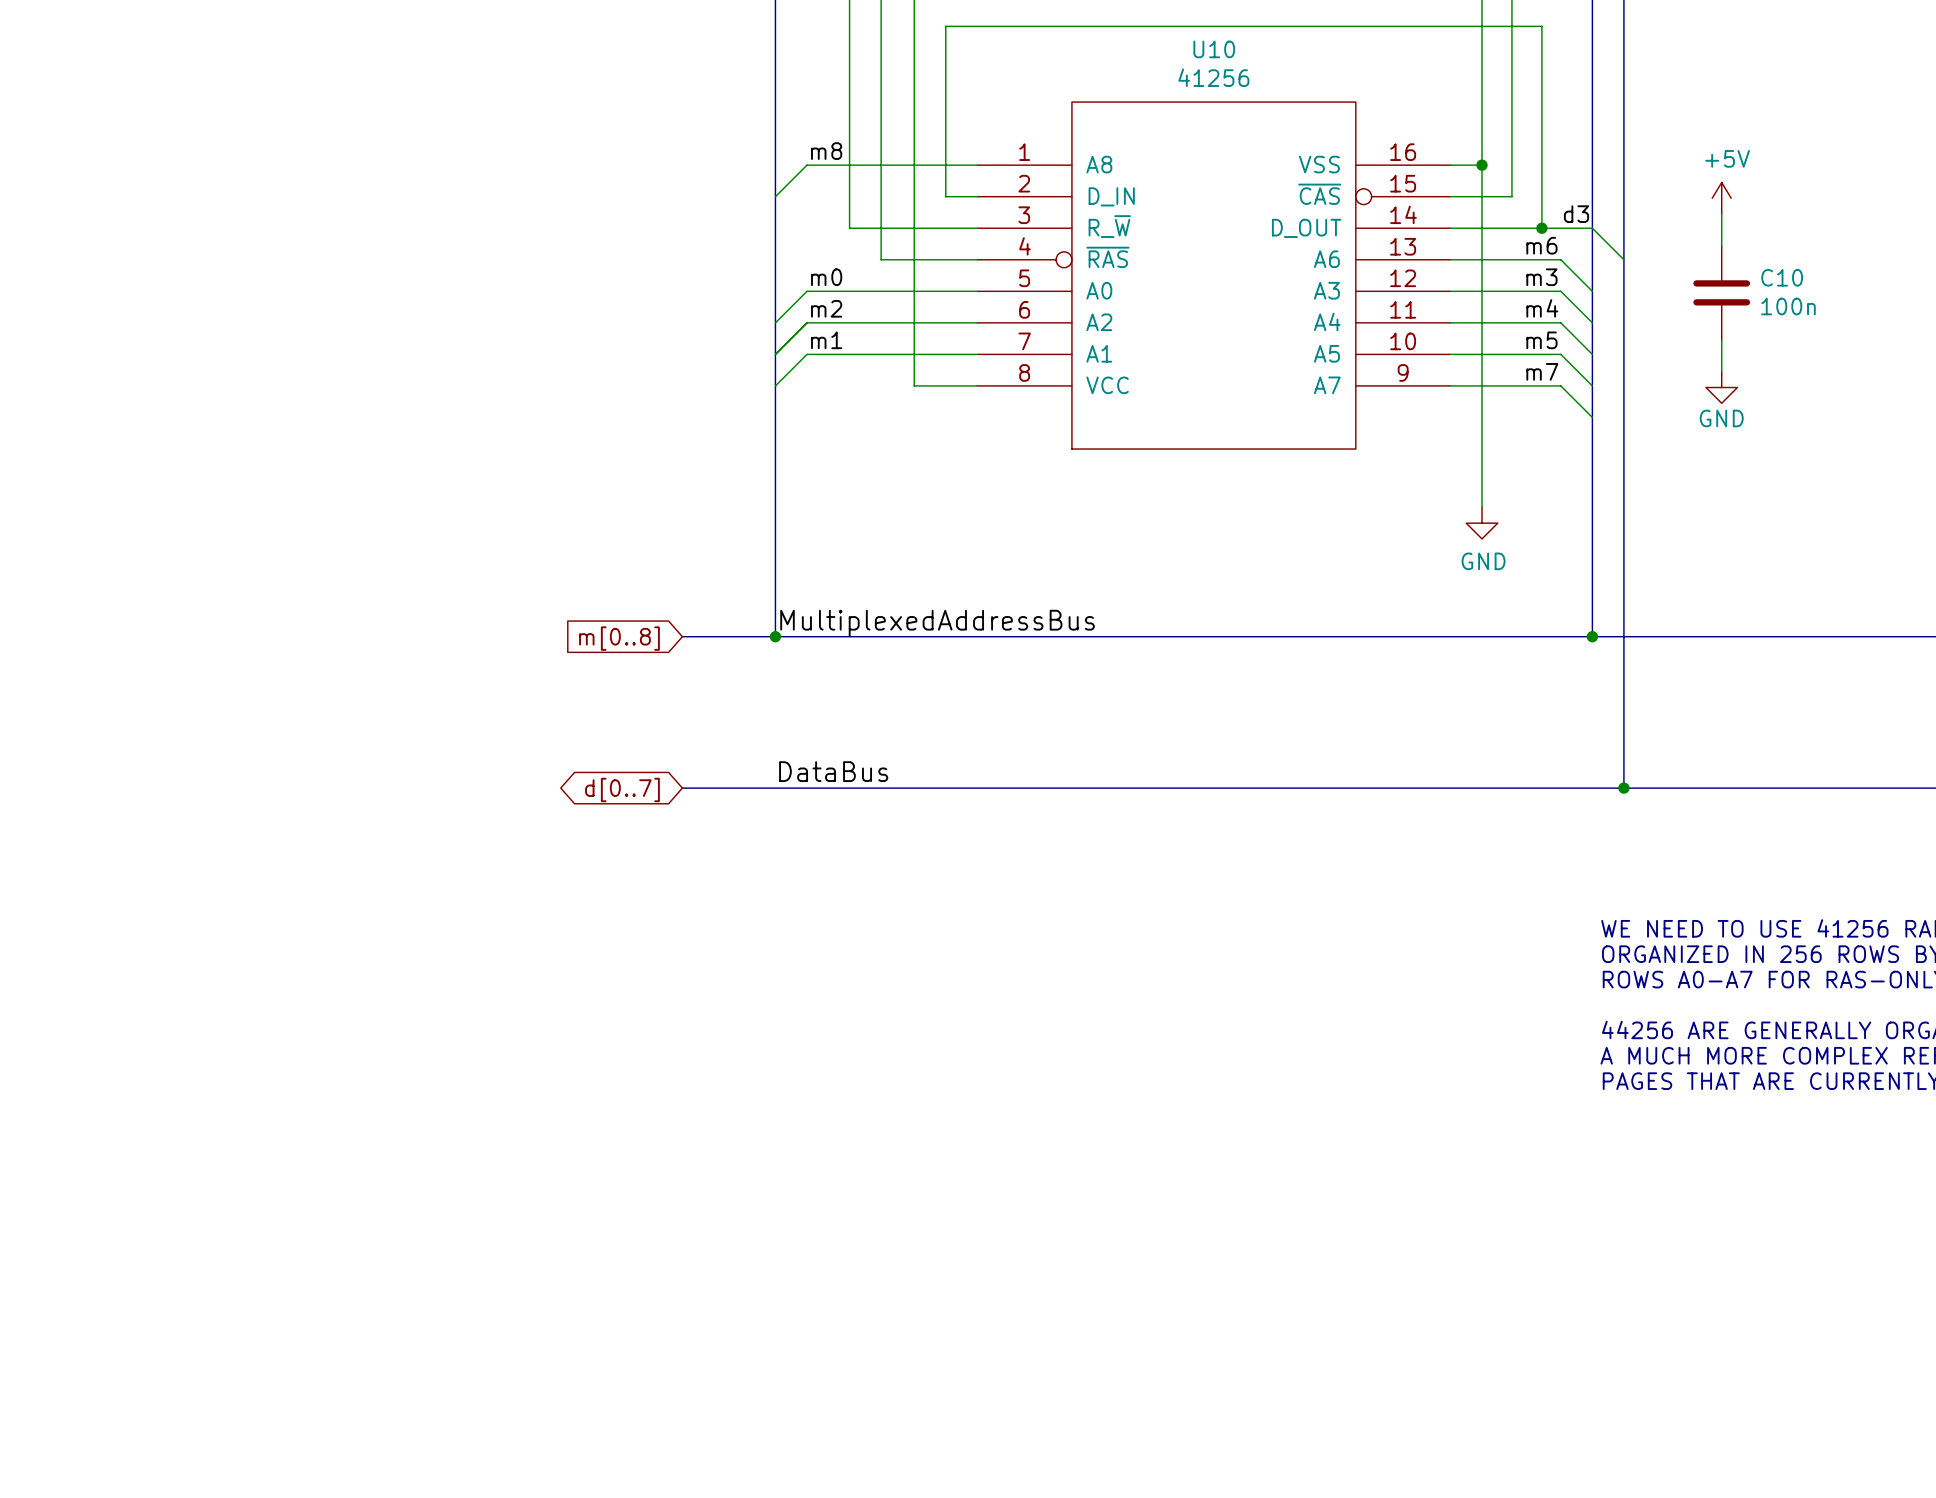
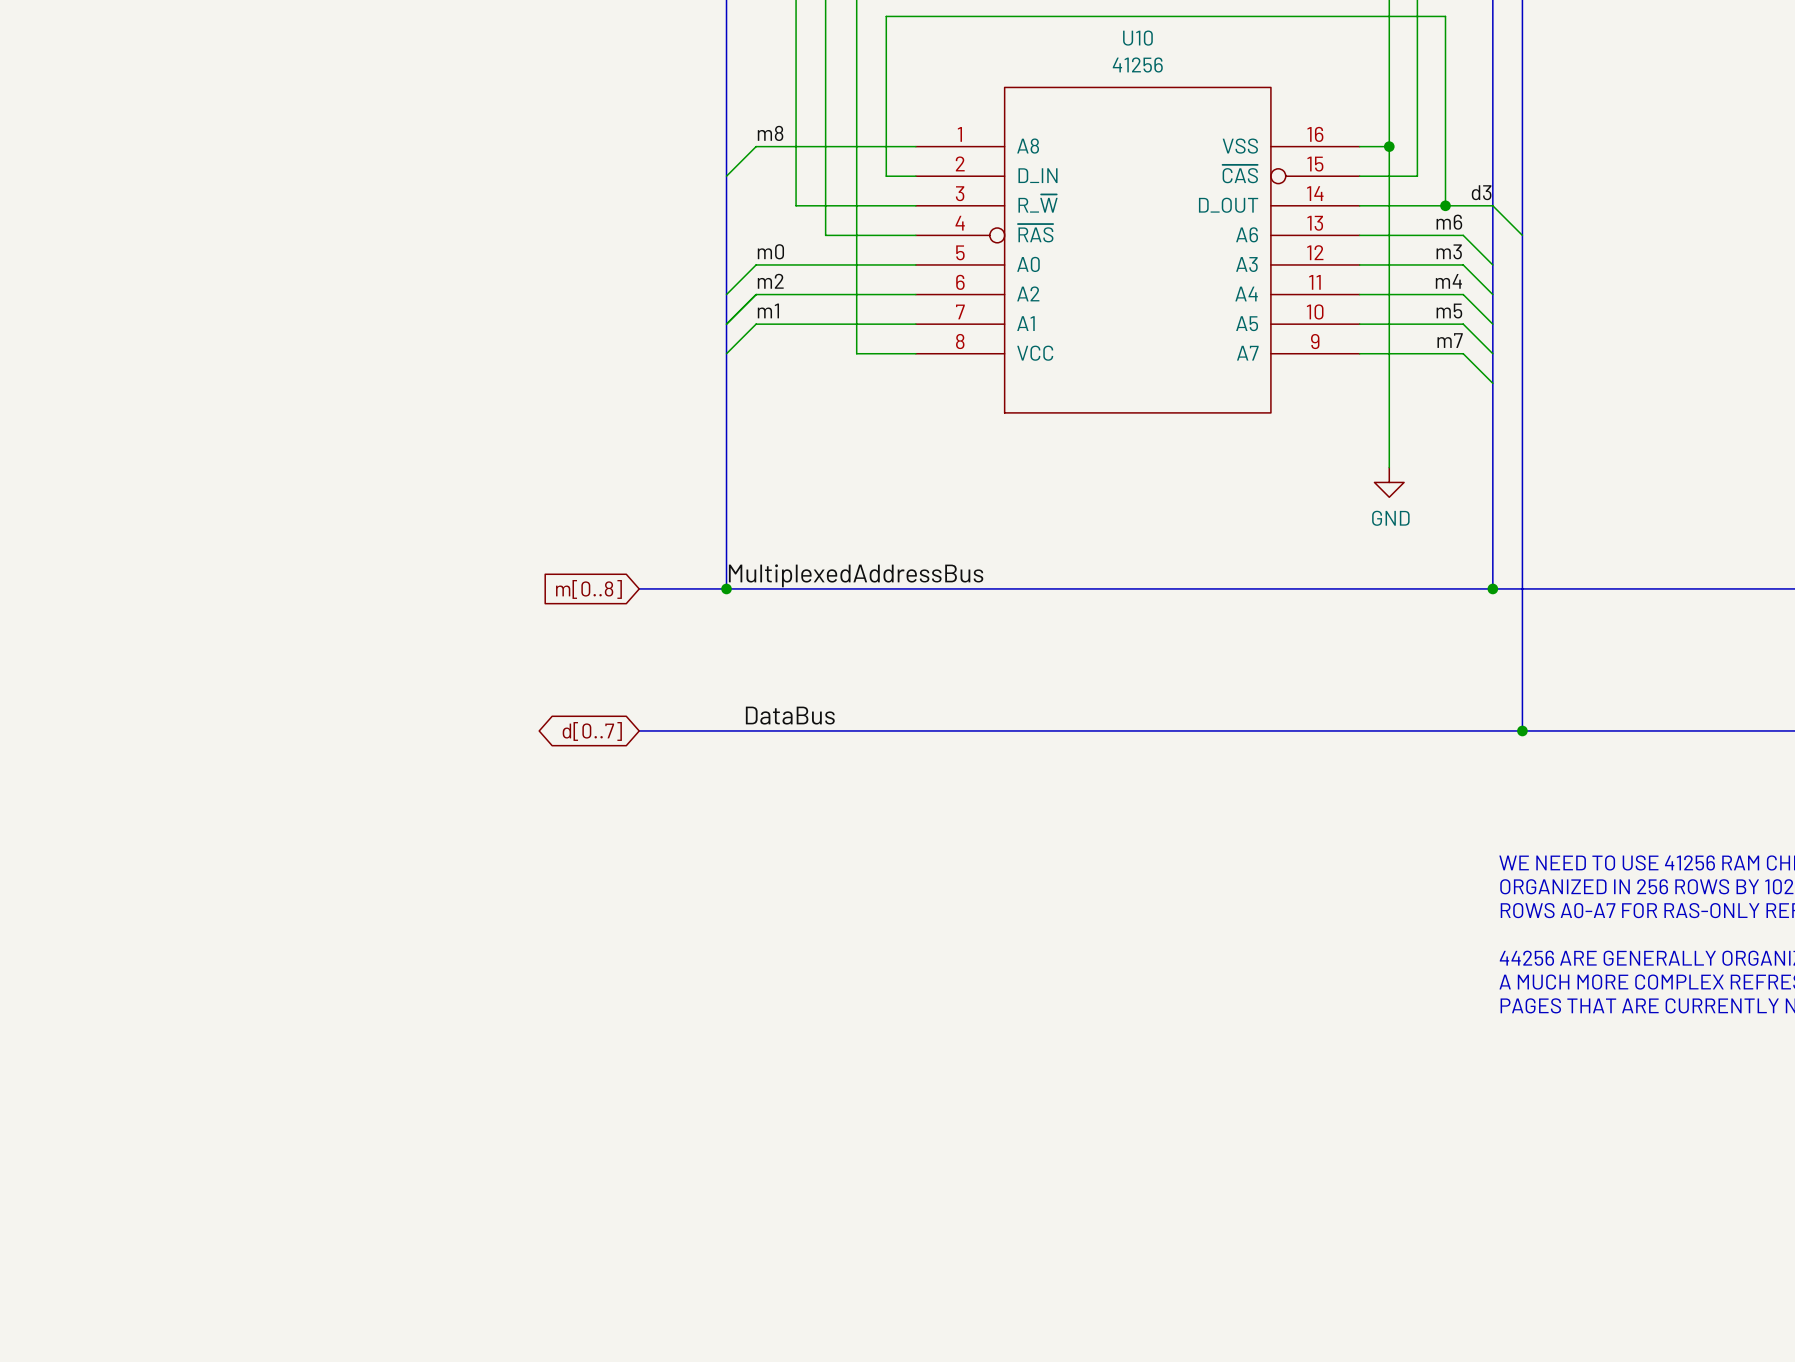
power symbol: +5V (1721, 198) -> none
wire: (1721, 214) (1721, 245) -> none
C10: 100n (1721, 292) -> none
wire: (1721, 340) (1721, 371) -> none
power symbol: GND (1721, 387) -> none

